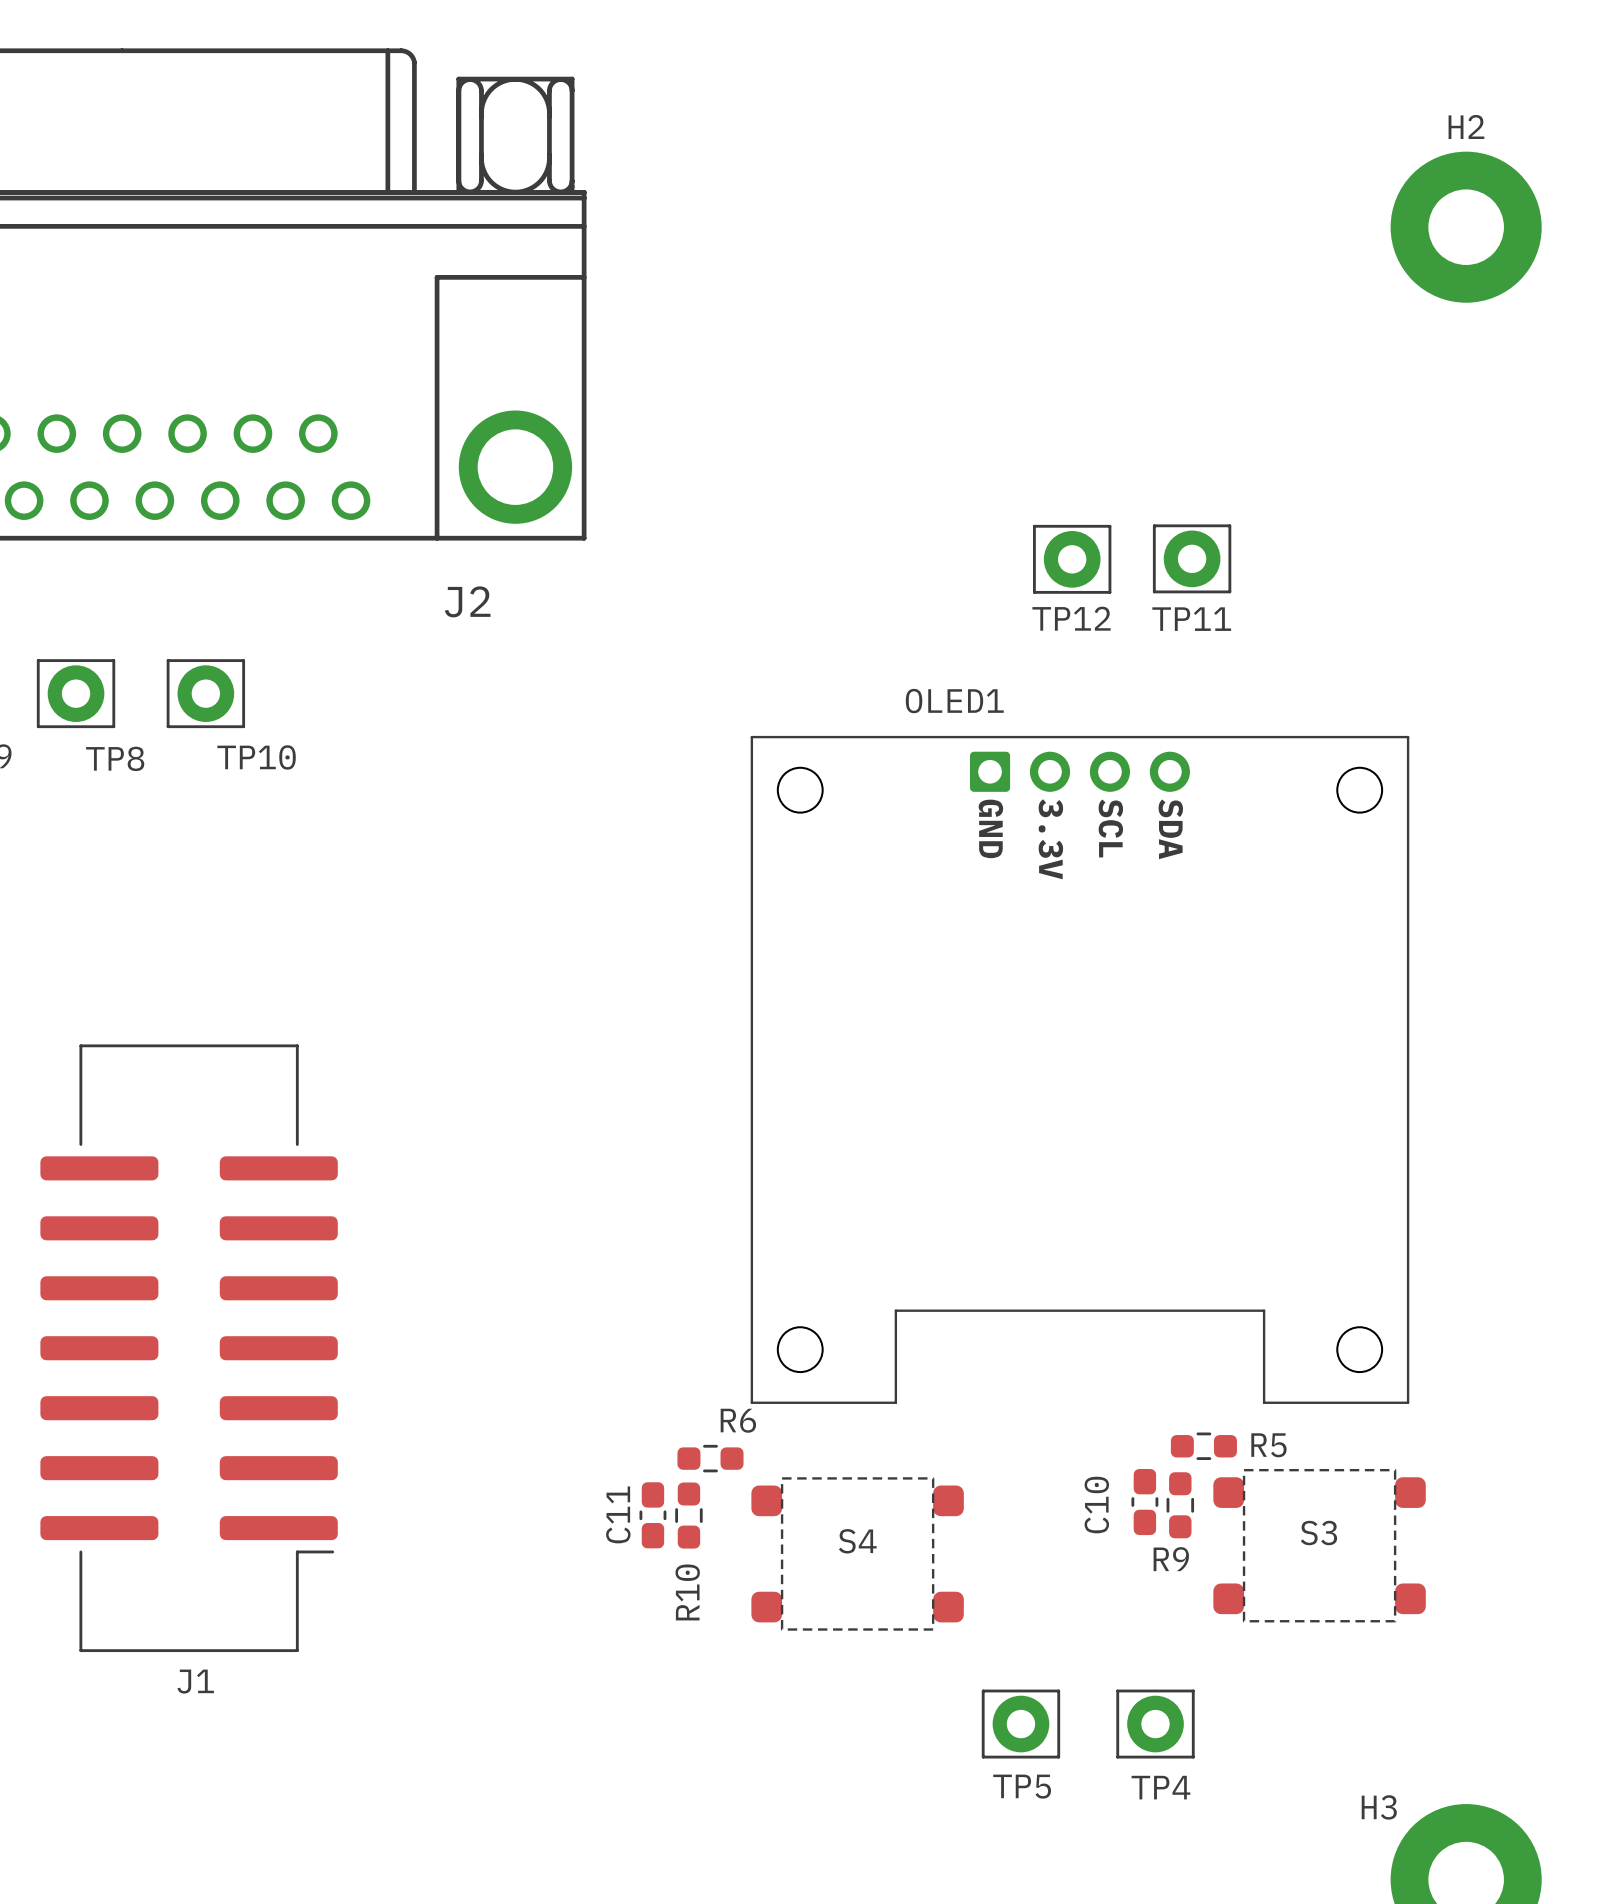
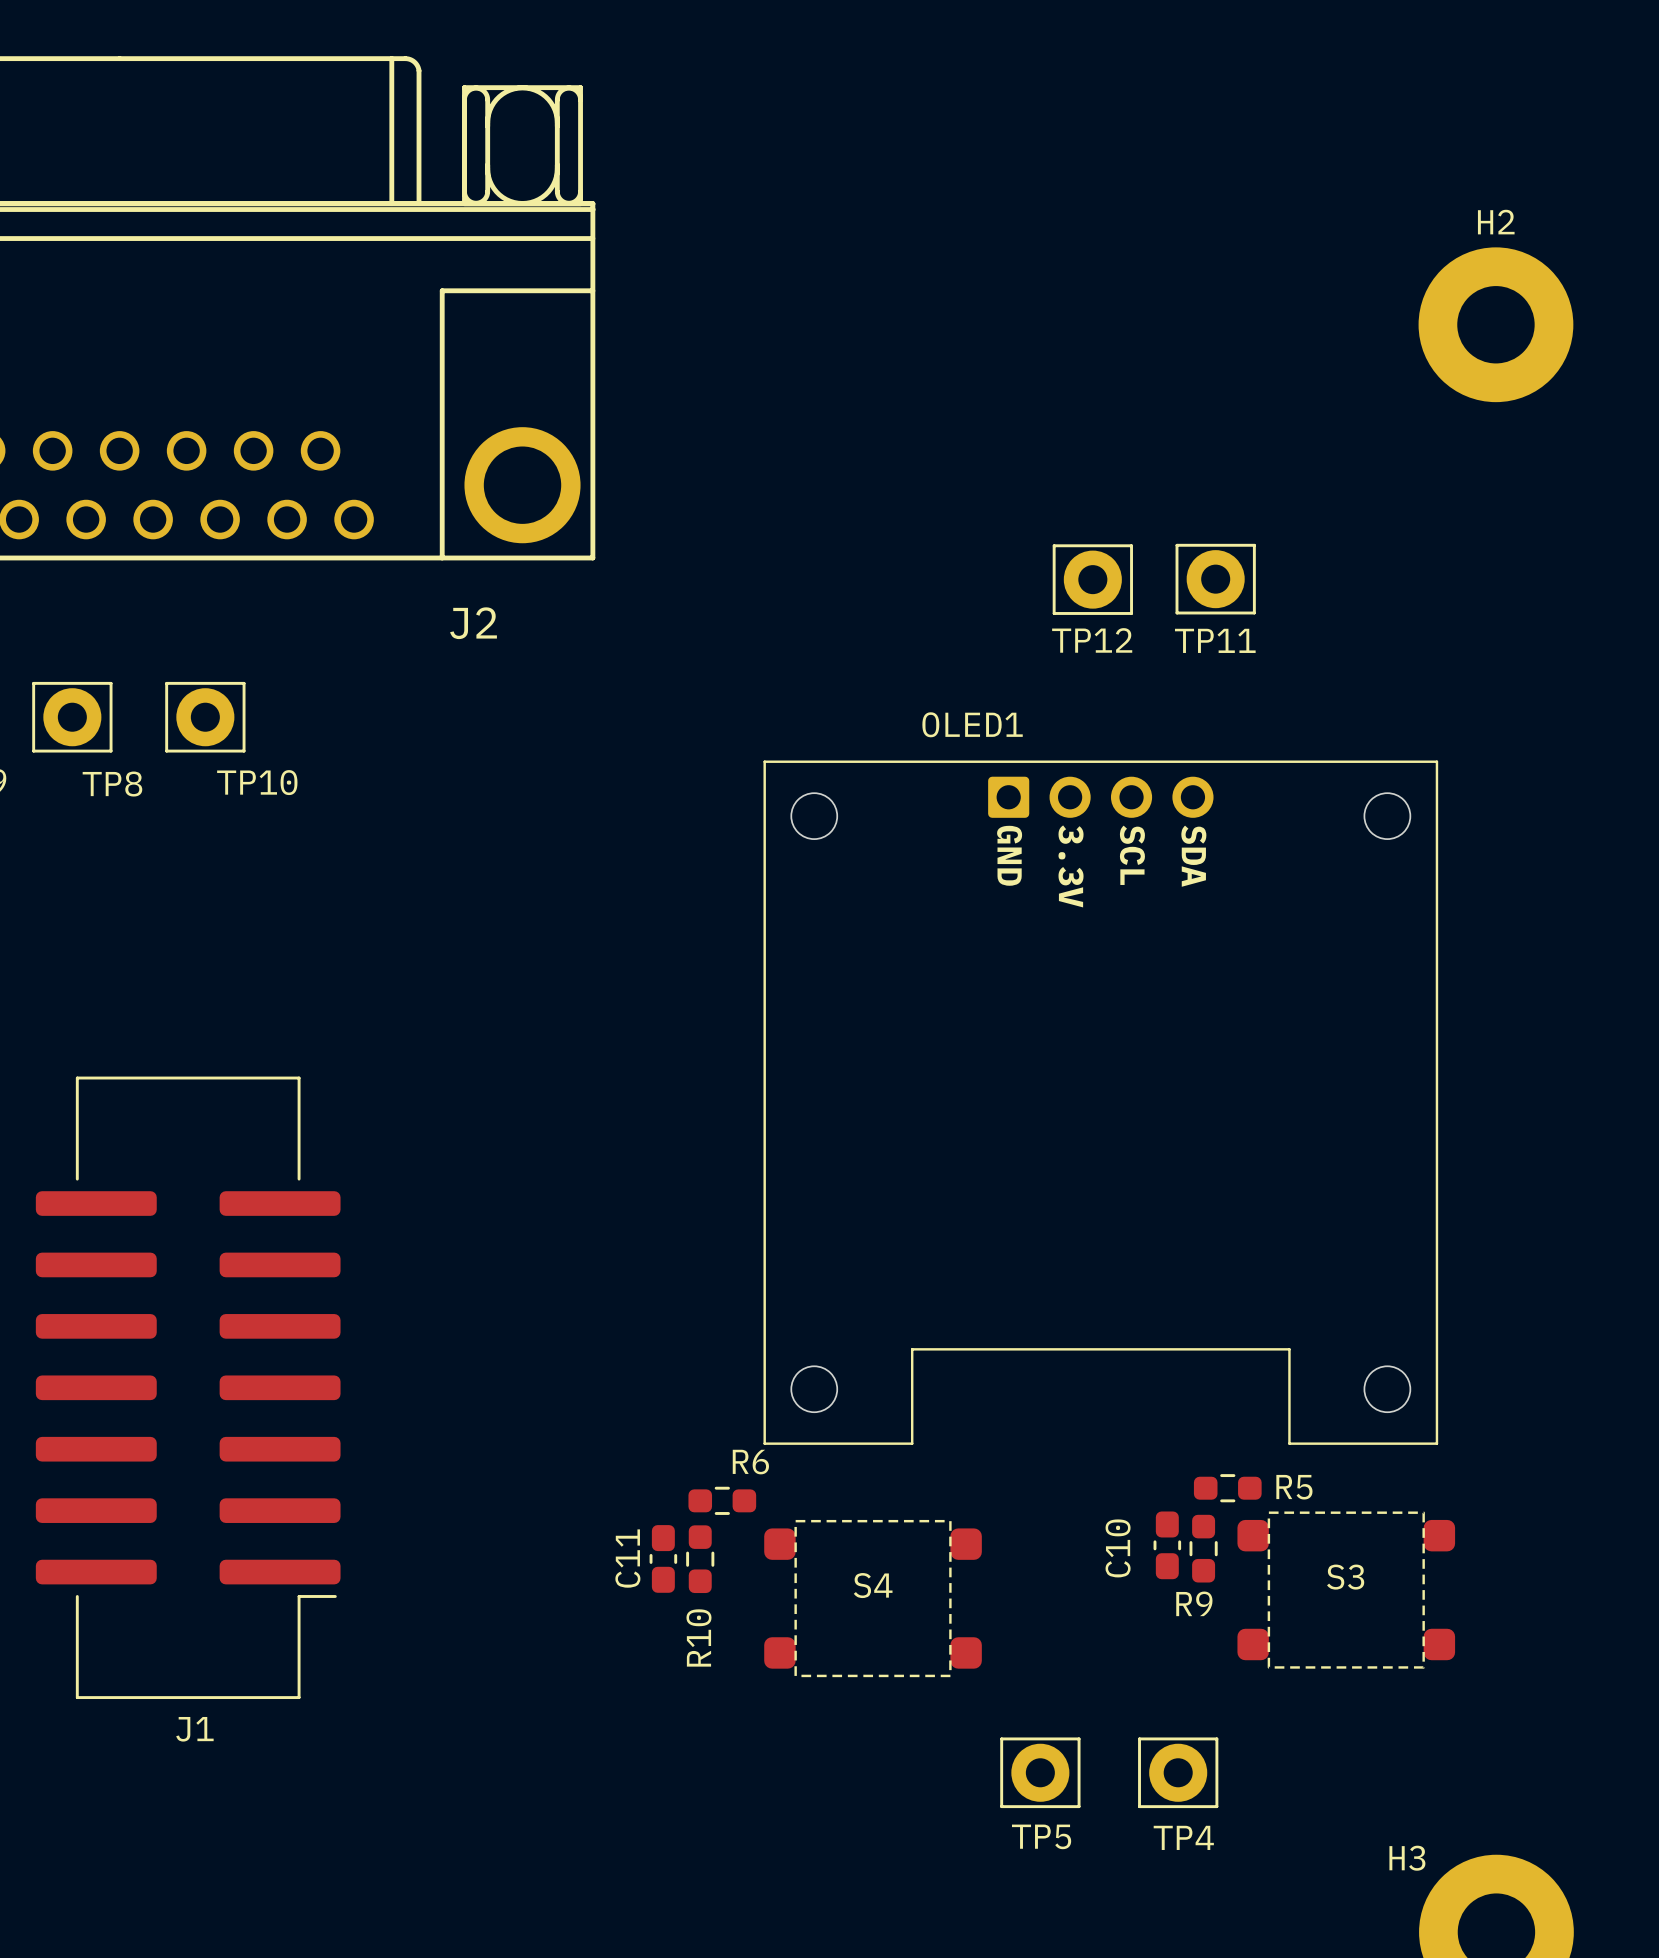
H2 position: (1466, 227) -> (1495, 324)

